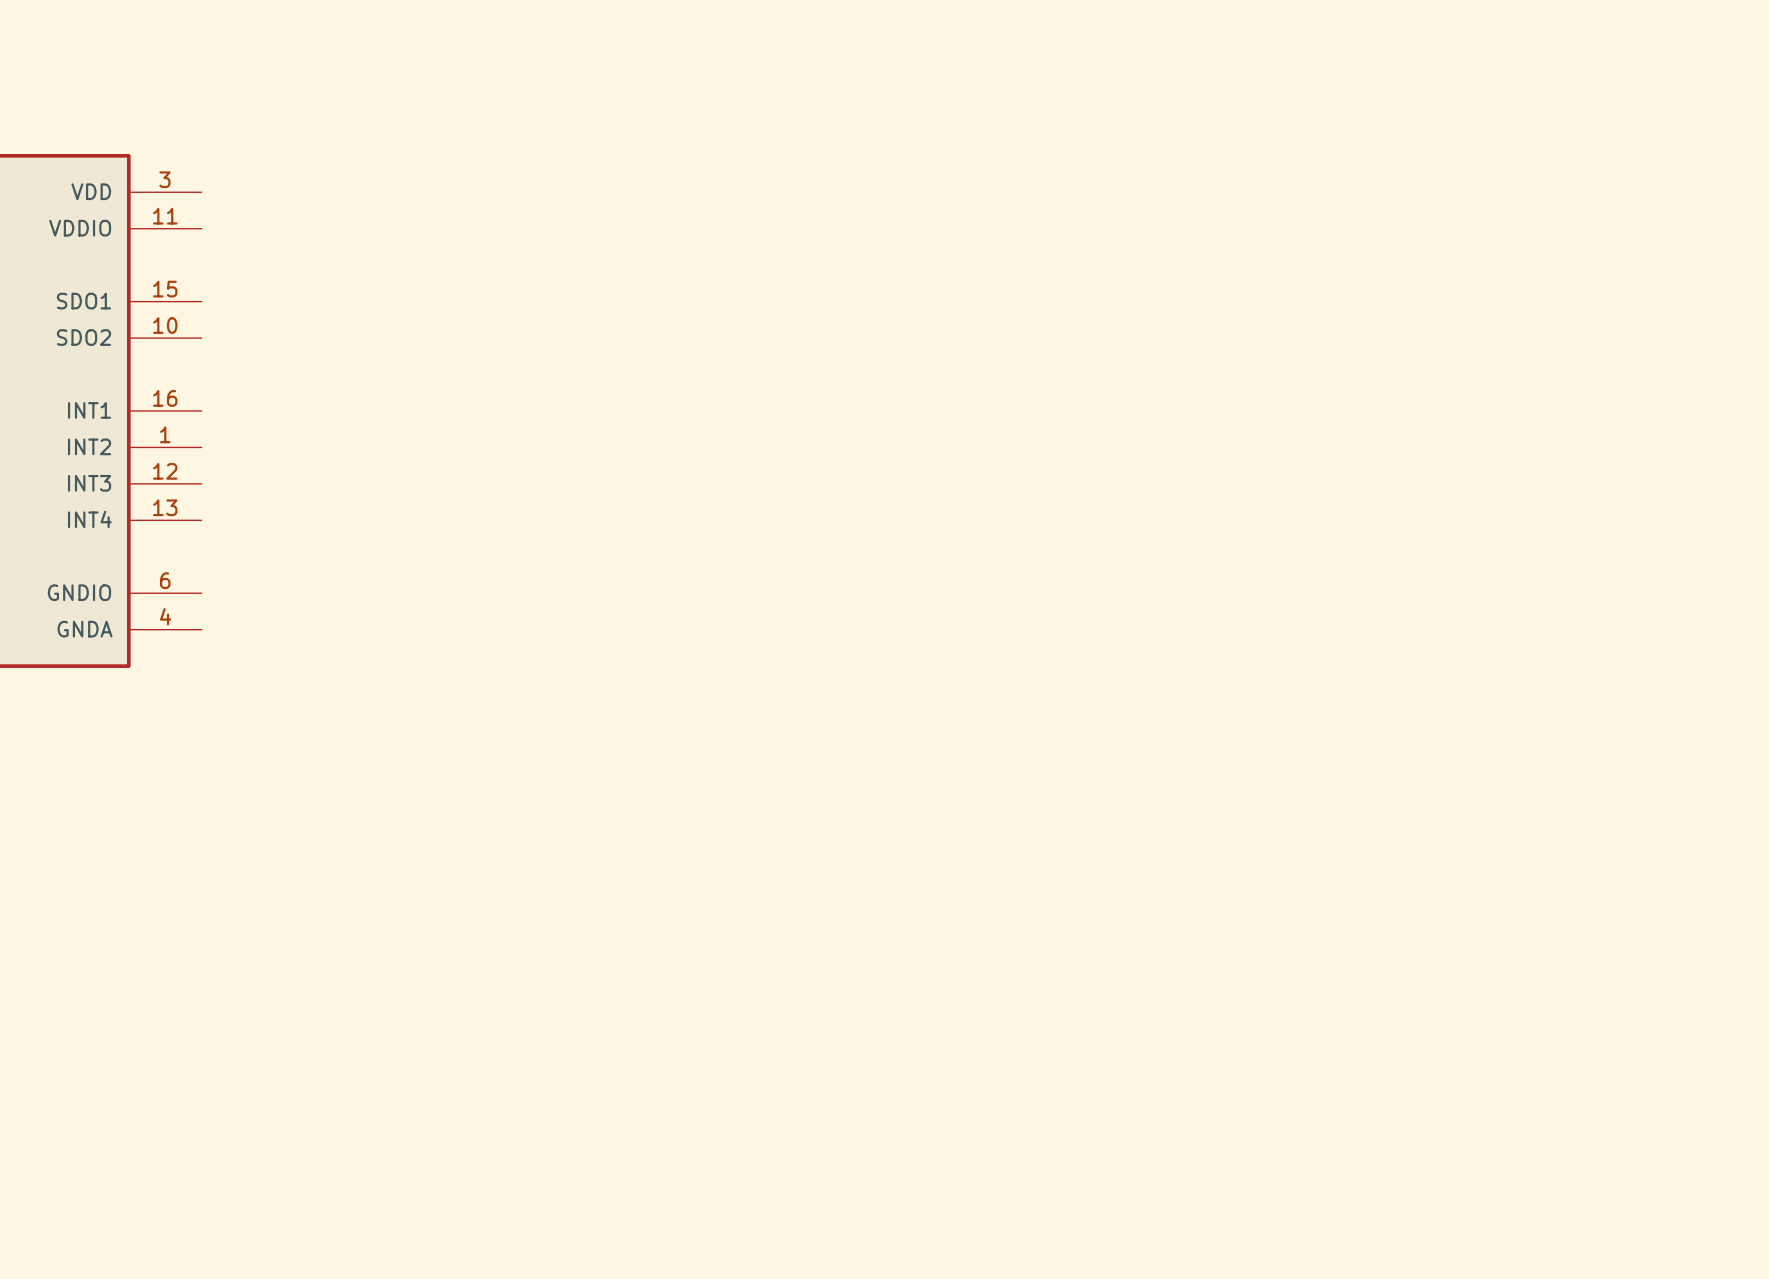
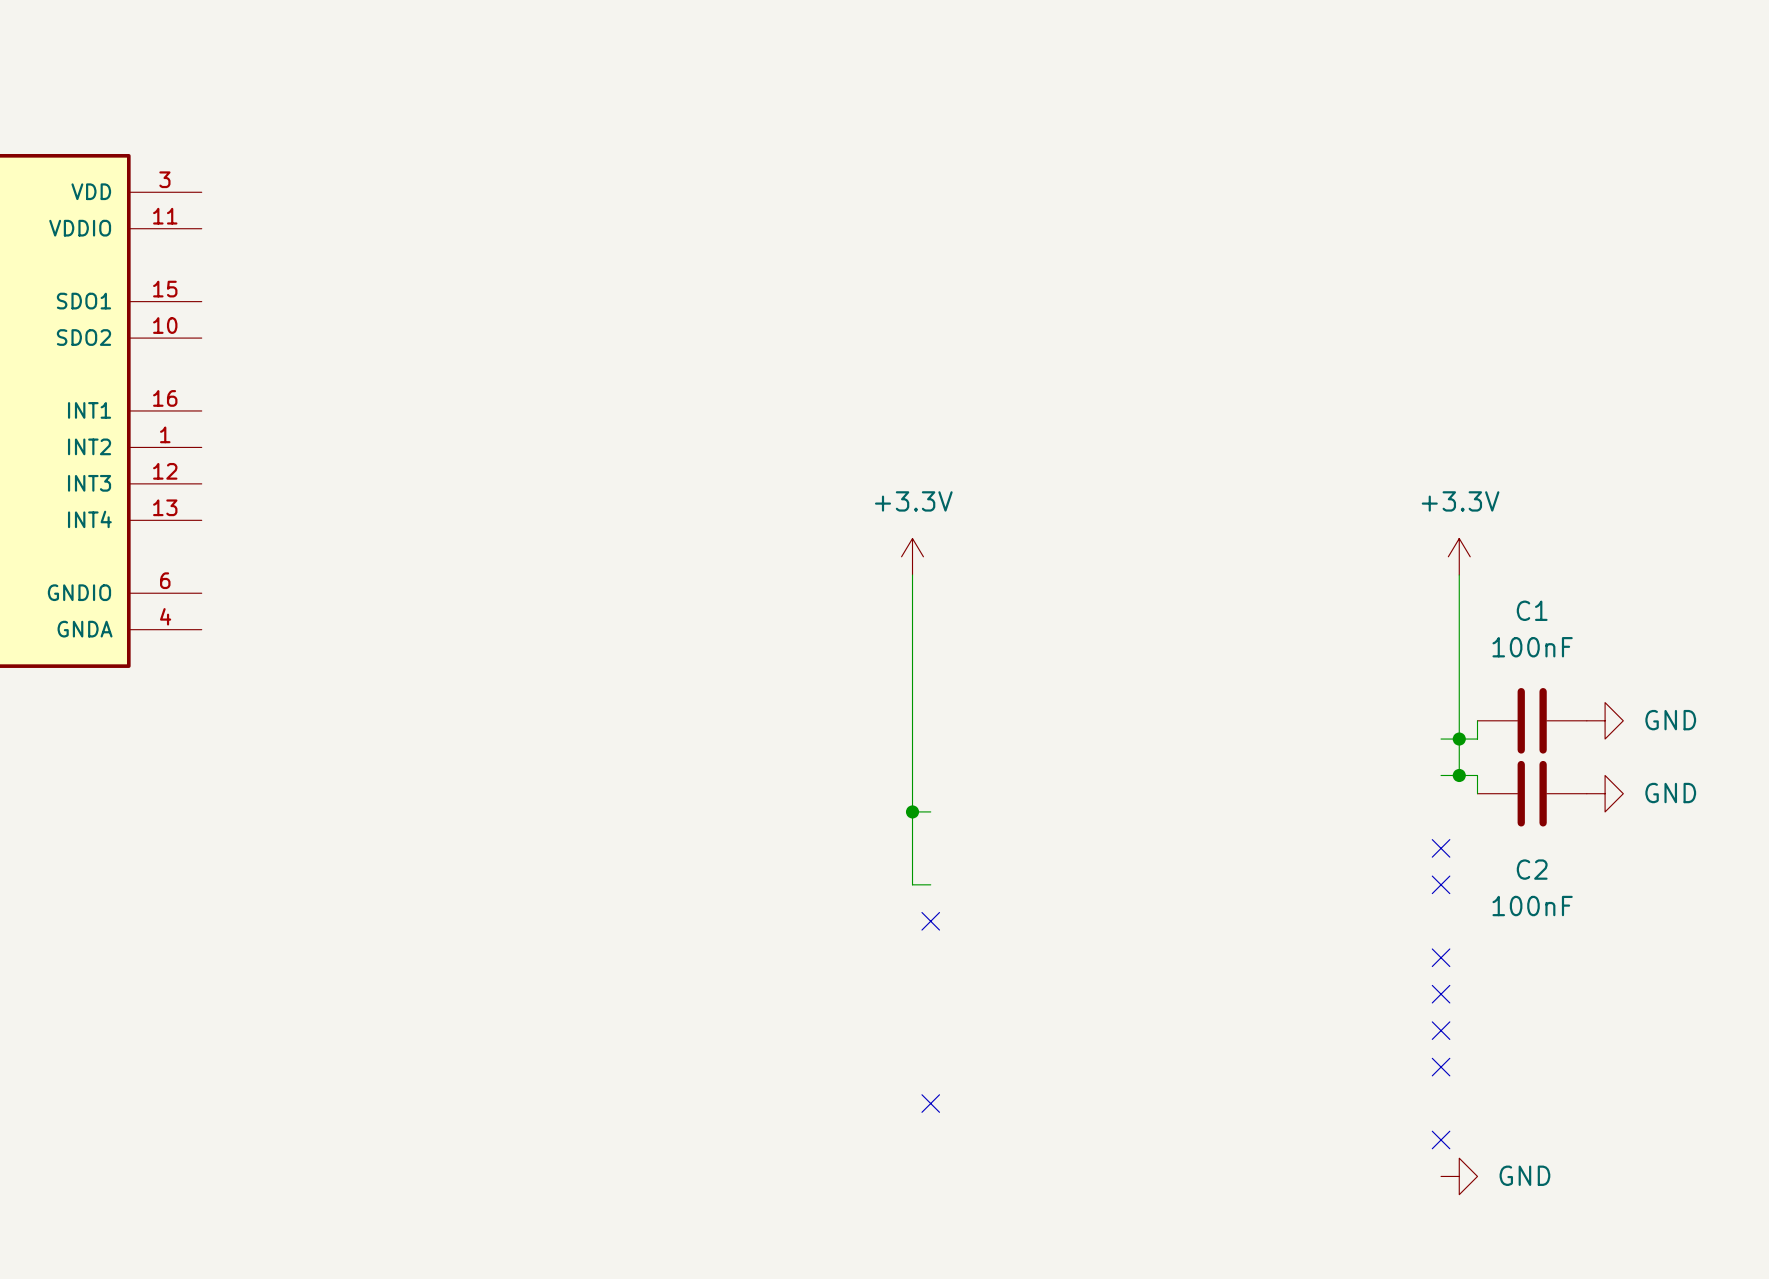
power symbol: none -> +3.3V (912, 556)
power symbol: none -> +3.3V (1459, 556)
wire: none -> (912, 575) (912, 884) (930, 884)
wire: none -> (1459, 575) (1459, 775)
wire: none -> (1477, 720) (1477, 739) (1441, 739)
C1: none -> 100nF (1532, 720)
power symbol: none -> GND (1605, 720)
junction: none -> (1459, 739)
wire: none -> (1441, 775) (1477, 775) (1477, 793)
junction: none -> (1459, 775)
C2: none -> 100nF (1532, 793)
power symbol: none -> GND (1605, 793)
wire: none -> (912, 811) (930, 811)
junction: none -> (912, 811)
no-connect mark: none -> (1441, 848)
no-connect mark: none -> (1441, 884)
no-connect mark: none -> (930, 921)
no-connect mark: none -> (1441, 957)
no-connect mark: none -> (1441, 994)
no-connect mark: none -> (1441, 1030)
no-connect mark: none -> (1441, 1067)
no-connect mark: none -> (930, 1103)
no-connect mark: none -> (1441, 1139)
power symbol: none -> GND (1459, 1176)

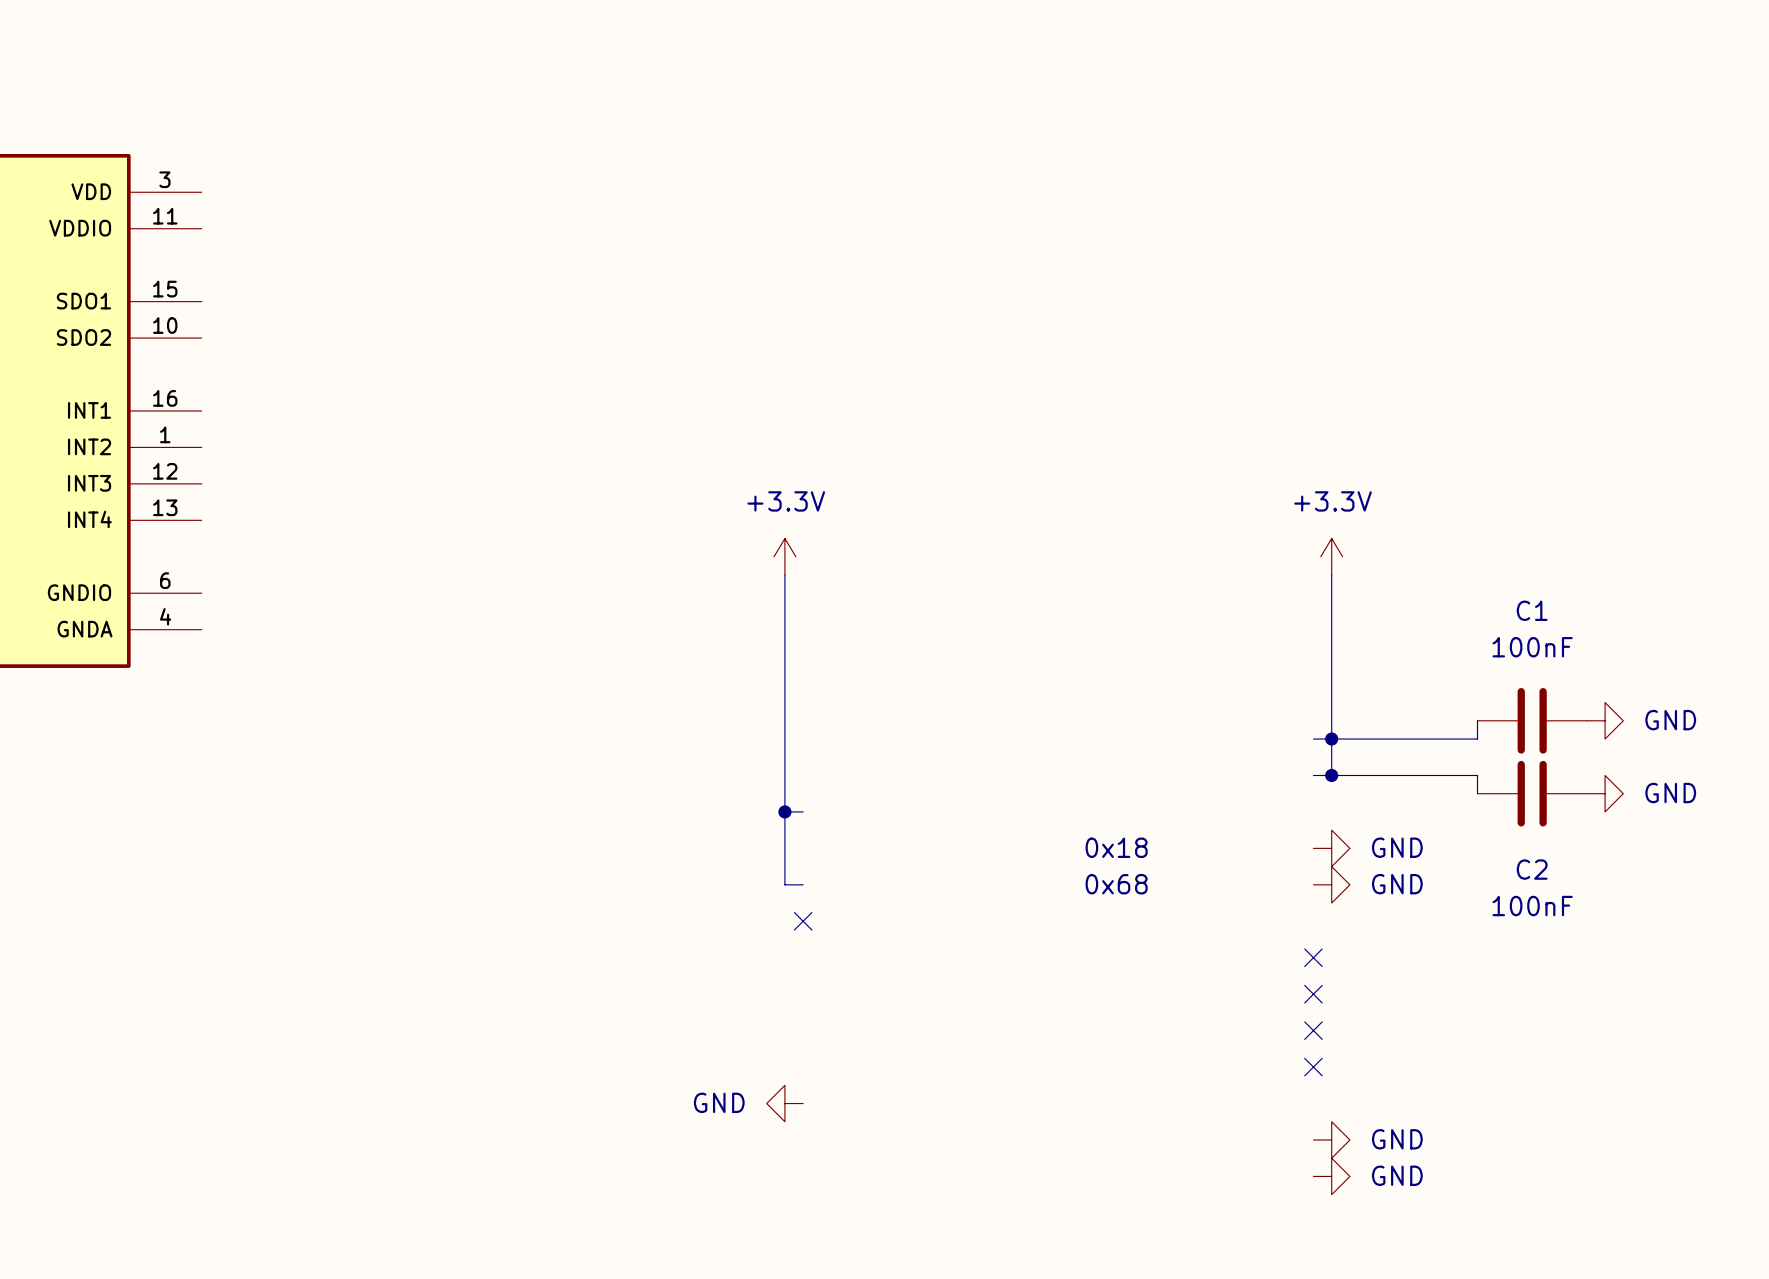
power symbol position: +3.3V (912, 556) -> +3.3V (784, 556)
power symbol position: +3.3V (1459, 556) -> +3.3V (1331, 556)
wire: (912, 575) (912, 884) (930, 884) -> (784, 575) (784, 884) (803, 884)
wire: (1459, 575) (1459, 775) -> (1331, 575) (1331, 775)
wire: none -> (1313, 739) (1441, 739)
junction: none -> (1331, 739)
junction: (1459, 739) -> none
wire: none -> (1313, 775) (1441, 775)
junction: none -> (1331, 775)
junction: (1459, 775) -> none
junction: none -> (784, 811)
wire: (912, 811) (930, 811) -> (784, 811) (803, 811)
junction: (912, 811) -> none
text: none -> 0x18 (1116, 847)
power symbol: none -> GND (1331, 848)
no-connect mark: (1441, 848) -> none
text: none -> 0x68 (1116, 884)
power symbol: none -> GND (1331, 884)
no-connect mark: (1441, 884) -> none
no-connect mark: none -> (803, 921)
no-connect mark: (930, 921) -> none
no-connect mark: none -> (1313, 957)
no-connect mark: (1441, 957) -> none
no-connect mark: none -> (1313, 994)
no-connect mark: (1441, 994) -> none
no-connect mark: none -> (1313, 1030)
no-connect mark: (1441, 1030) -> none
no-connect mark: none -> (1313, 1067)
no-connect mark: (1441, 1067) -> none
power symbol: none -> GND (784, 1103)
no-connect mark: (930, 1103) -> none
power symbol: none -> GND (1331, 1139)
no-connect mark: (1441, 1139) -> none
power symbol: none -> GND (1331, 1176)
power symbol: GND (1459, 1176) -> none

